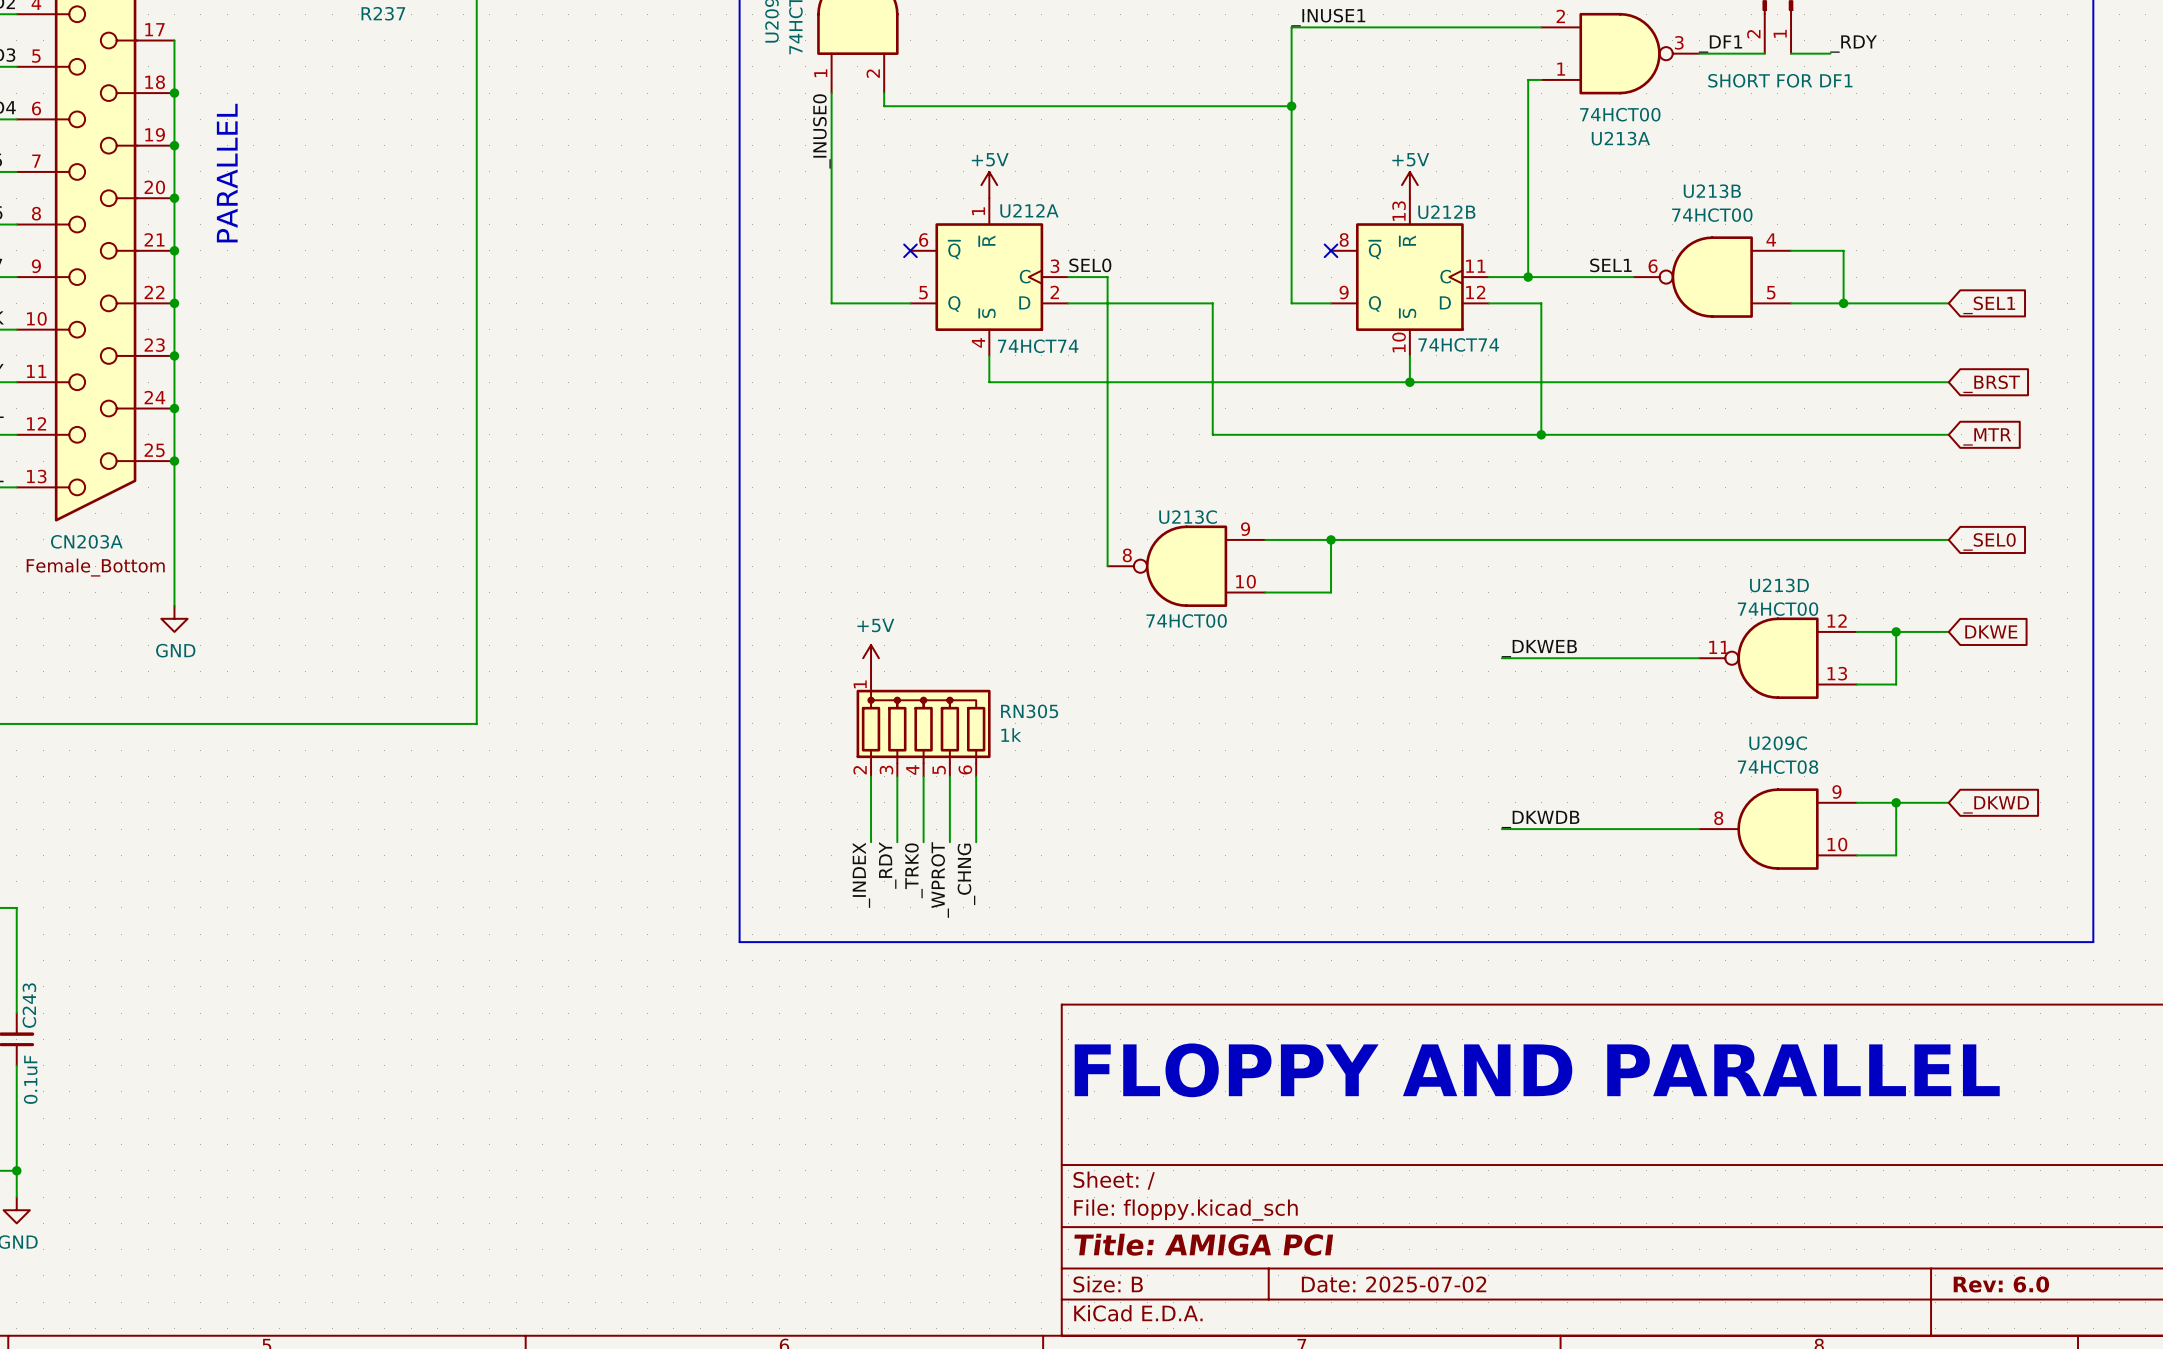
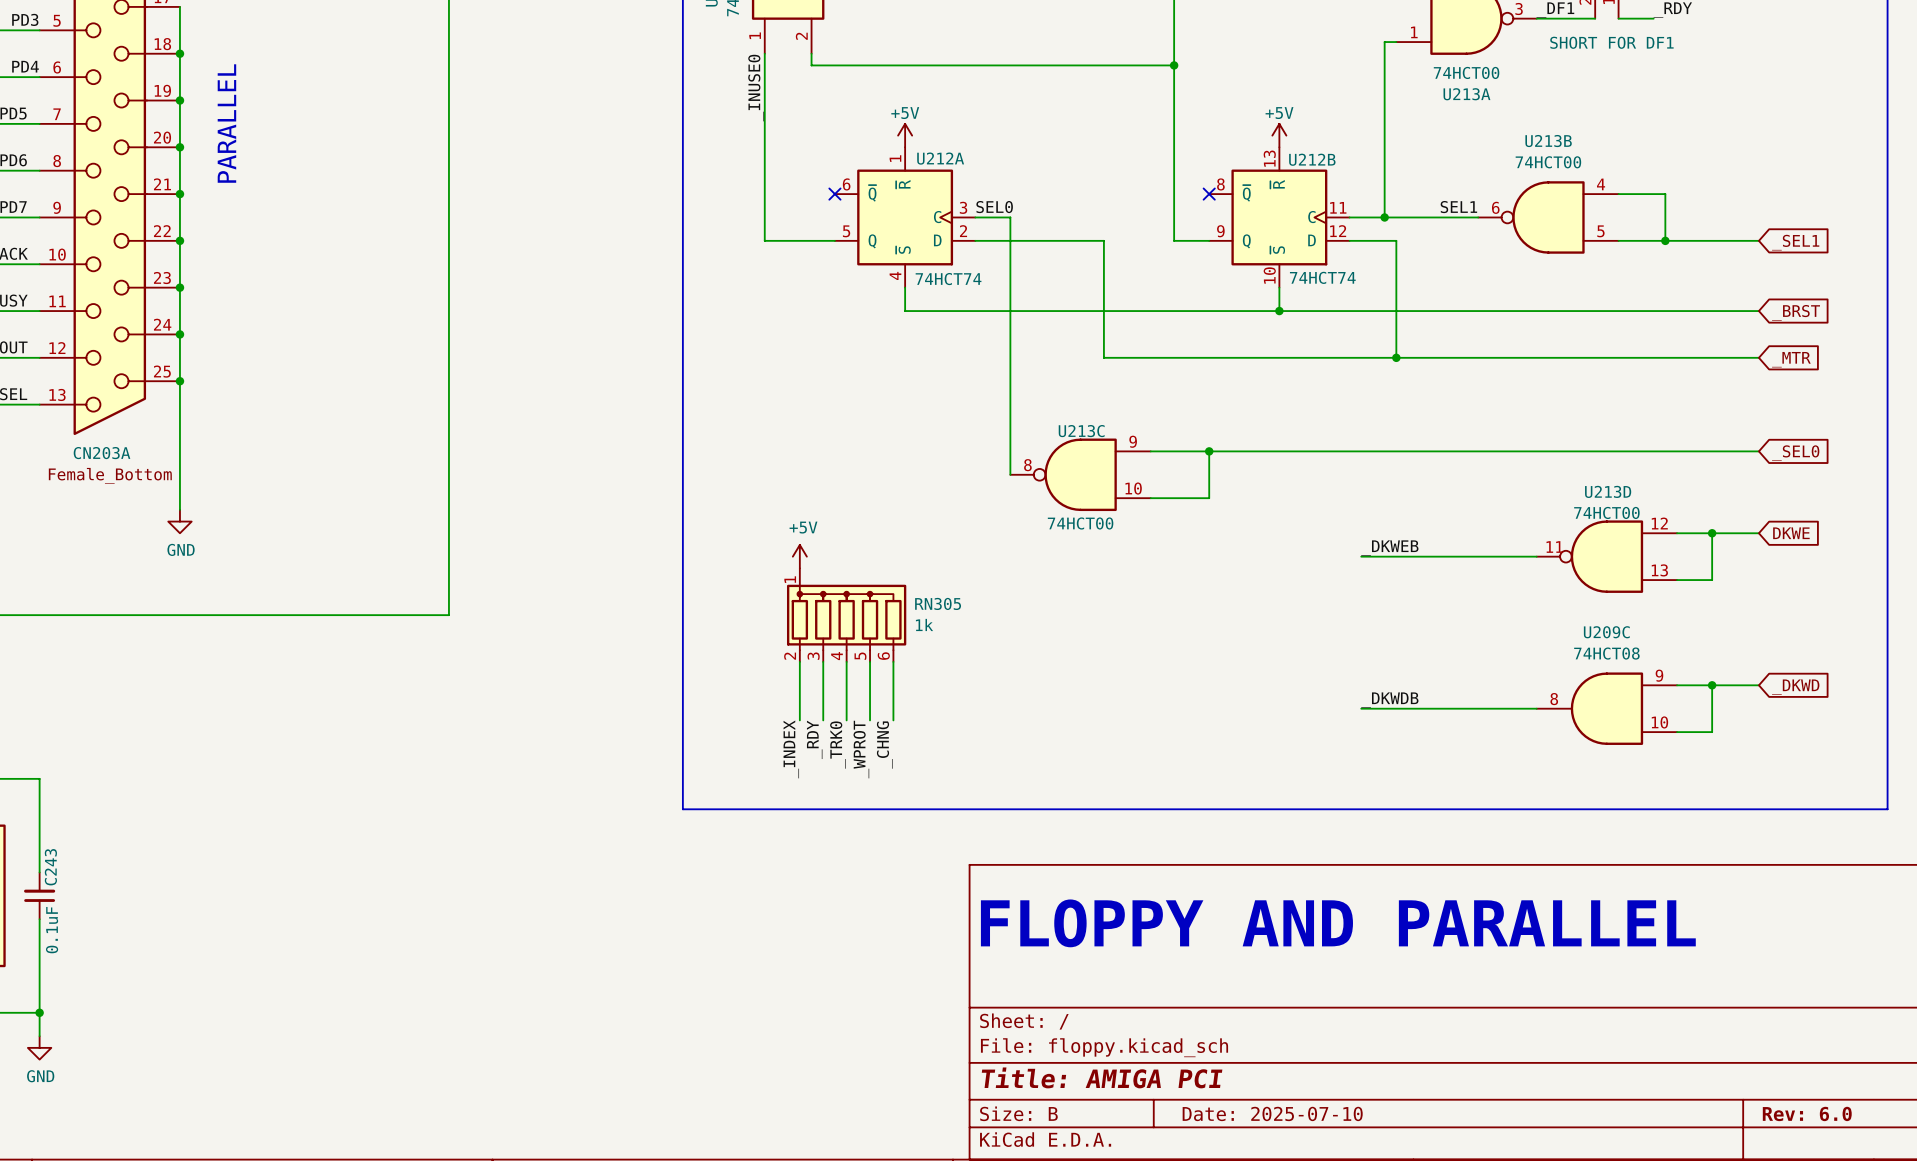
title block: Date: 2025-07-02 (1394, 1284) -> Date: 2025-07-10 (1272, 1113)

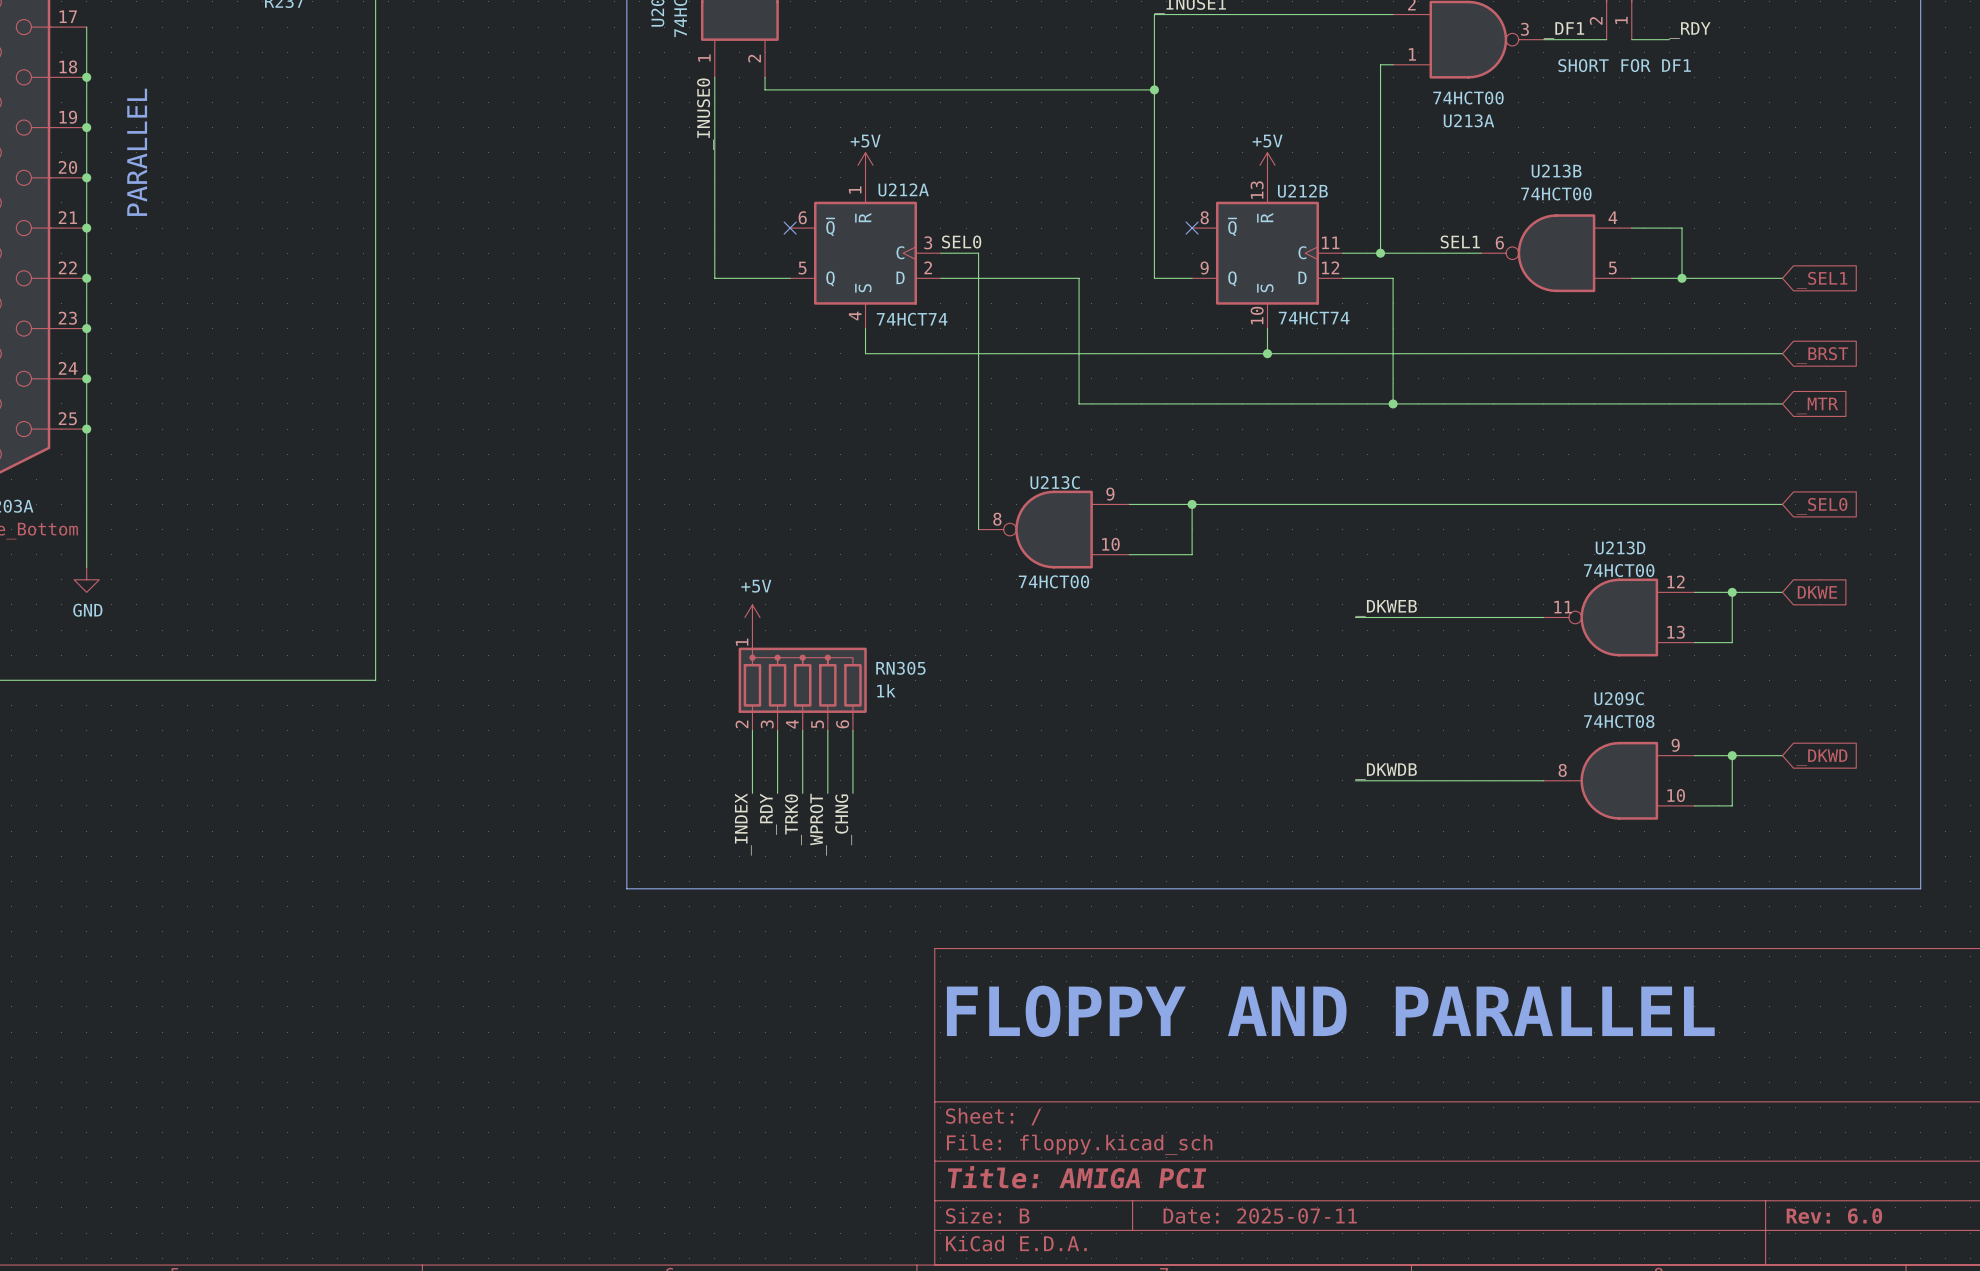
title block: Date: 2025-07-10 (1272, 1113) -> Date: 2025-07-11 (1260, 1216)

